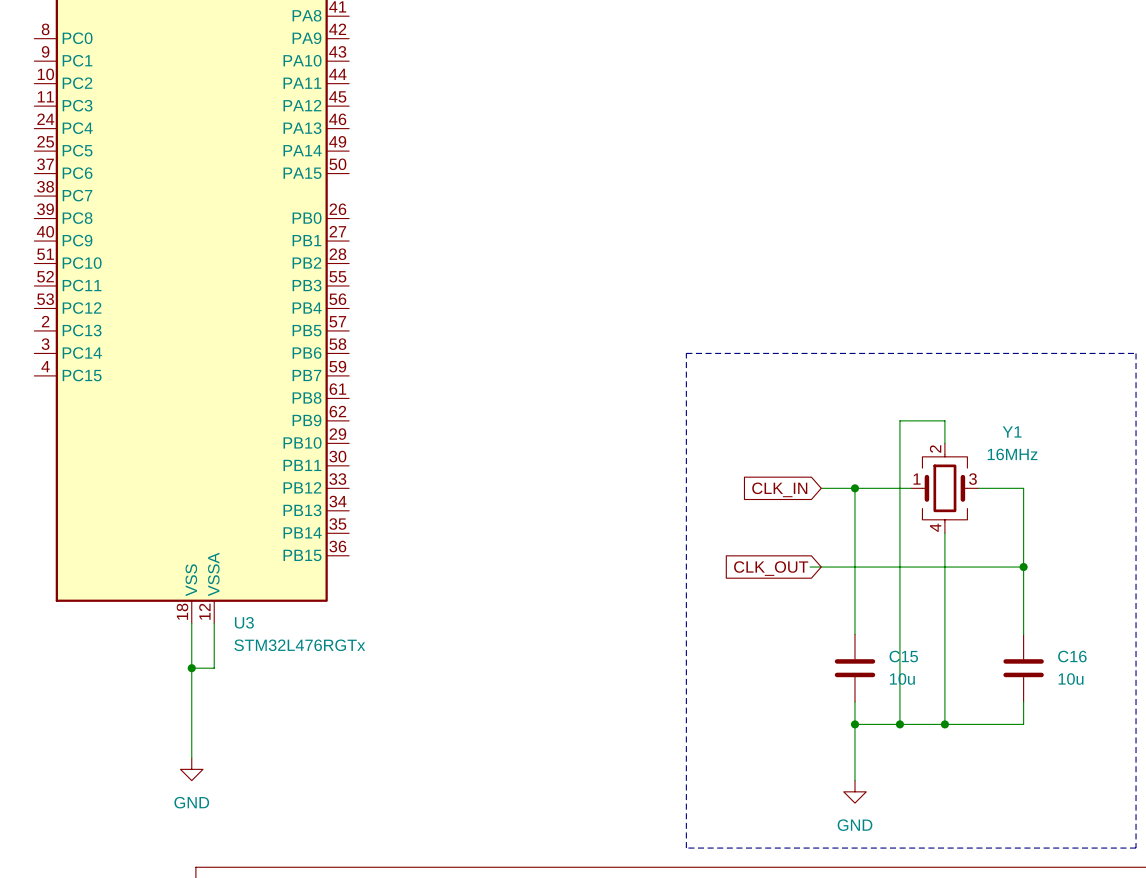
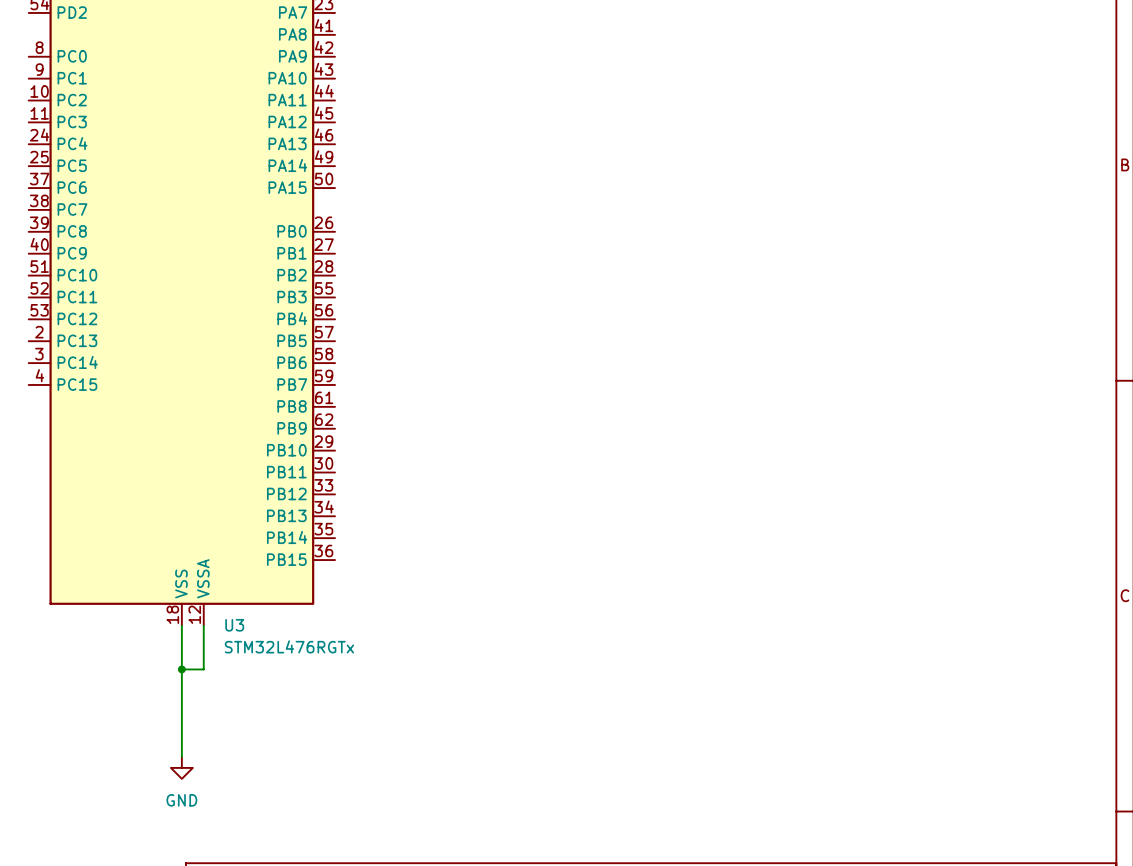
line: (686, 353) (1136, 353) (1136, 848) (686, 848) (686, 353) -> none
wire: (944, 443) (944, 420) (899, 420) (899, 724) -> none
wire: (821, 488) (911, 488) -> none
wire: (854, 488) (854, 634) -> none
junction: (854, 488) -> none
Y1: 16MHz (944, 488) -> none
wire: (978, 488) (1023, 488) (1023, 634) -> none
global label: CLK_IN (779, 489) -> none
wire: (944, 533) (944, 724) -> none
wire: (810, 567) (1023, 567) -> none
junction: (1023, 567) -> none
global label: CLK_OUT (771, 568) -> none
C15: 10u (854, 668) -> none
C16: 10u (1023, 668) -> none
wire: (854, 701) (854, 780) -> none
wire: (1023, 701) (1023, 724) (854, 724) -> none
junction: (854, 724) -> none
junction: (899, 724) -> none
junction: (944, 724) -> none
power symbol: GND (854, 791) -> none

